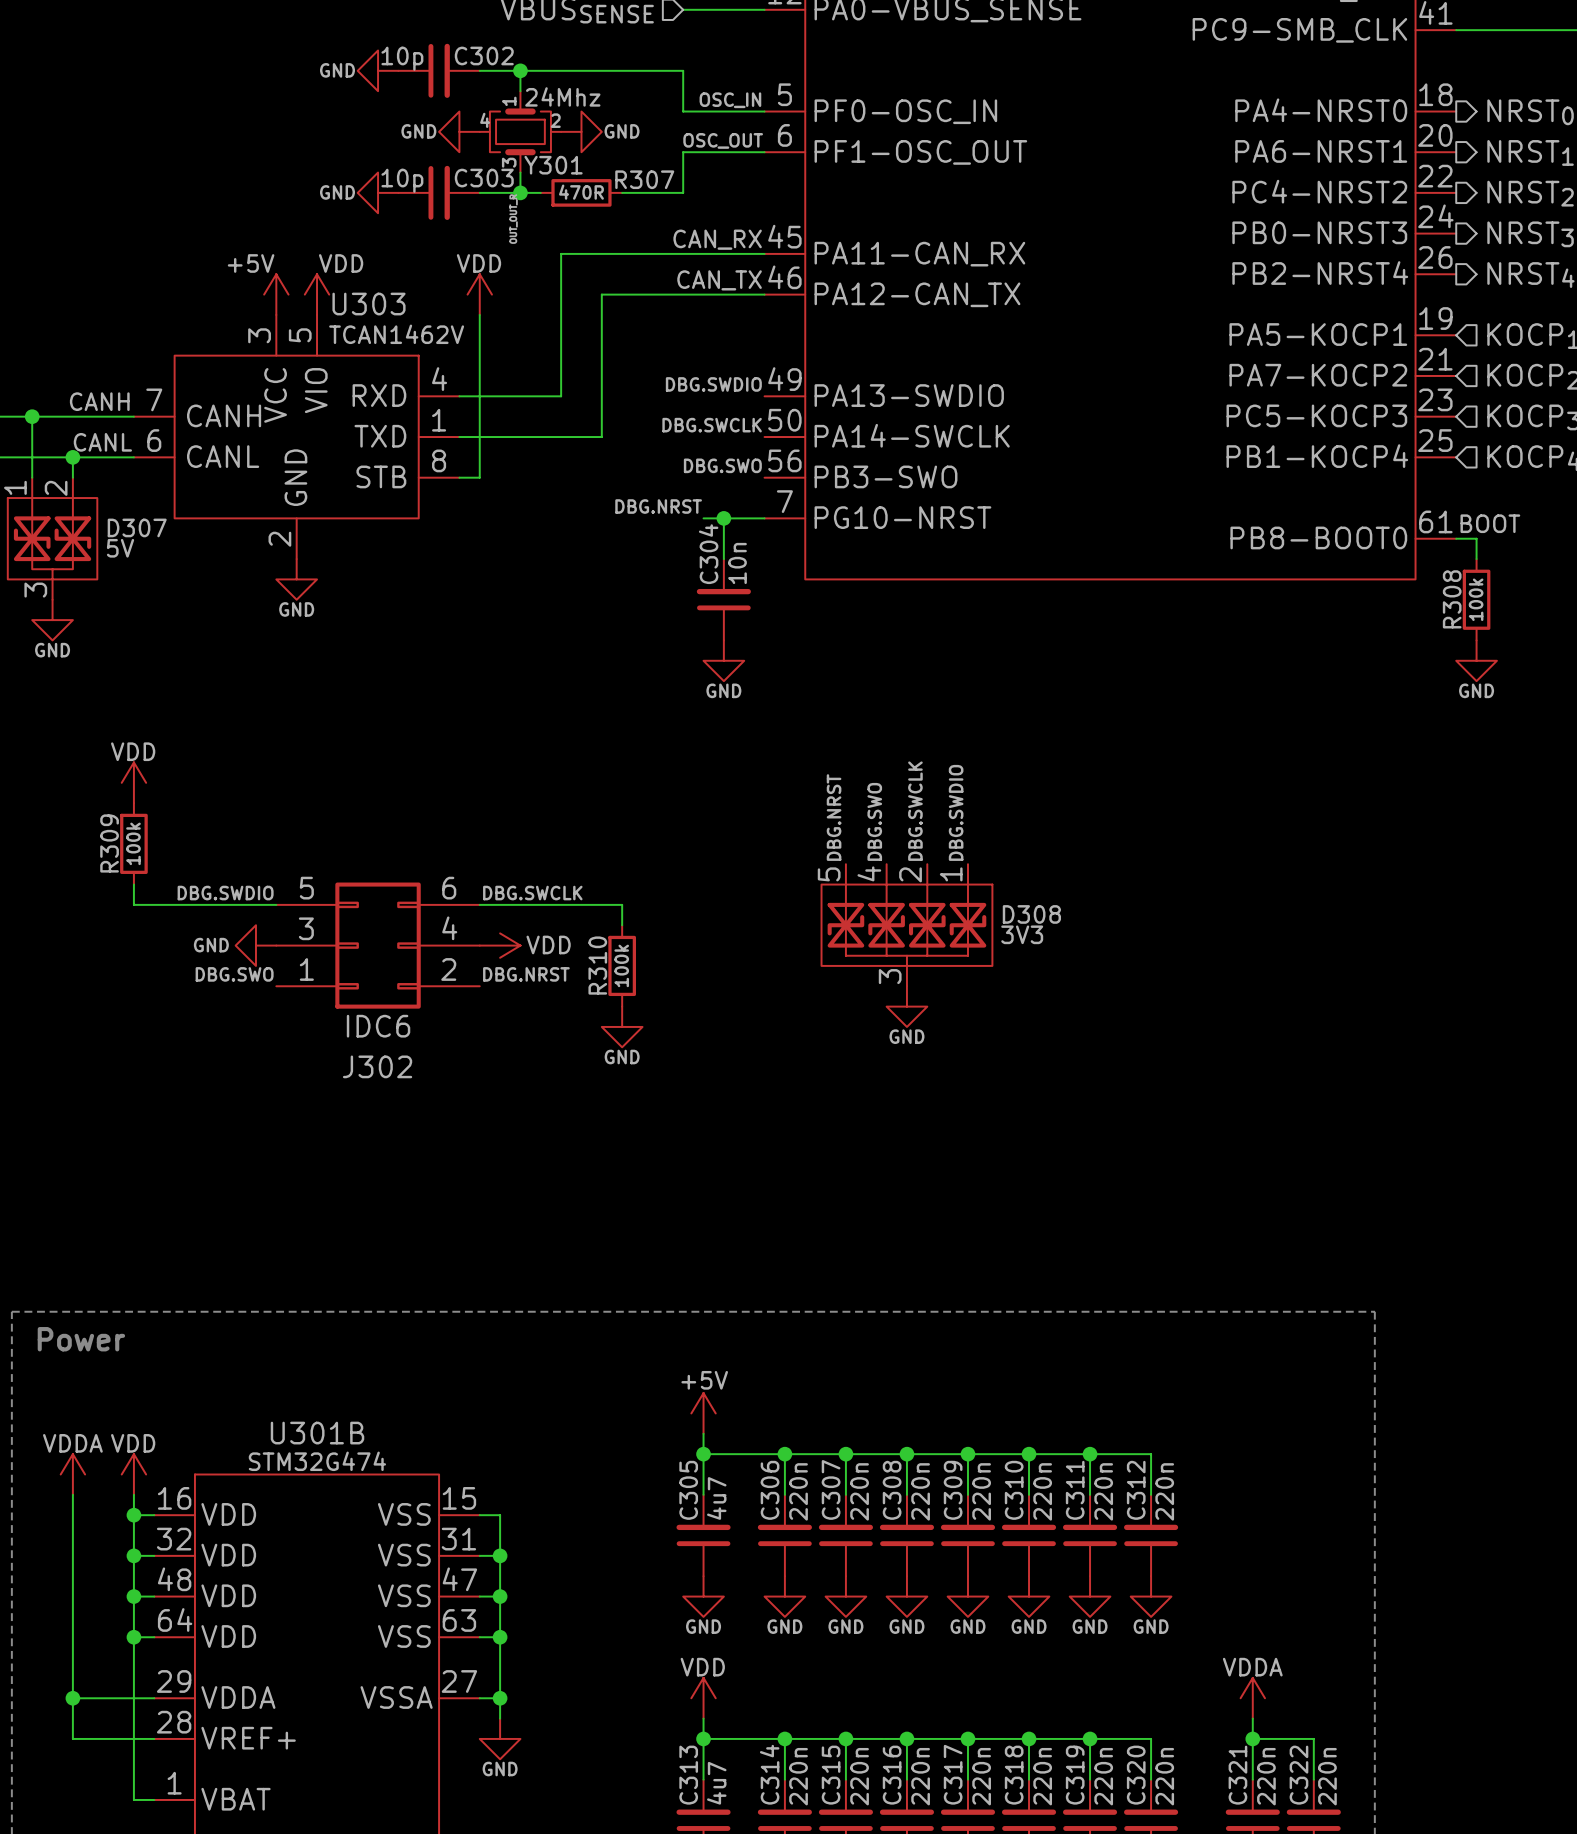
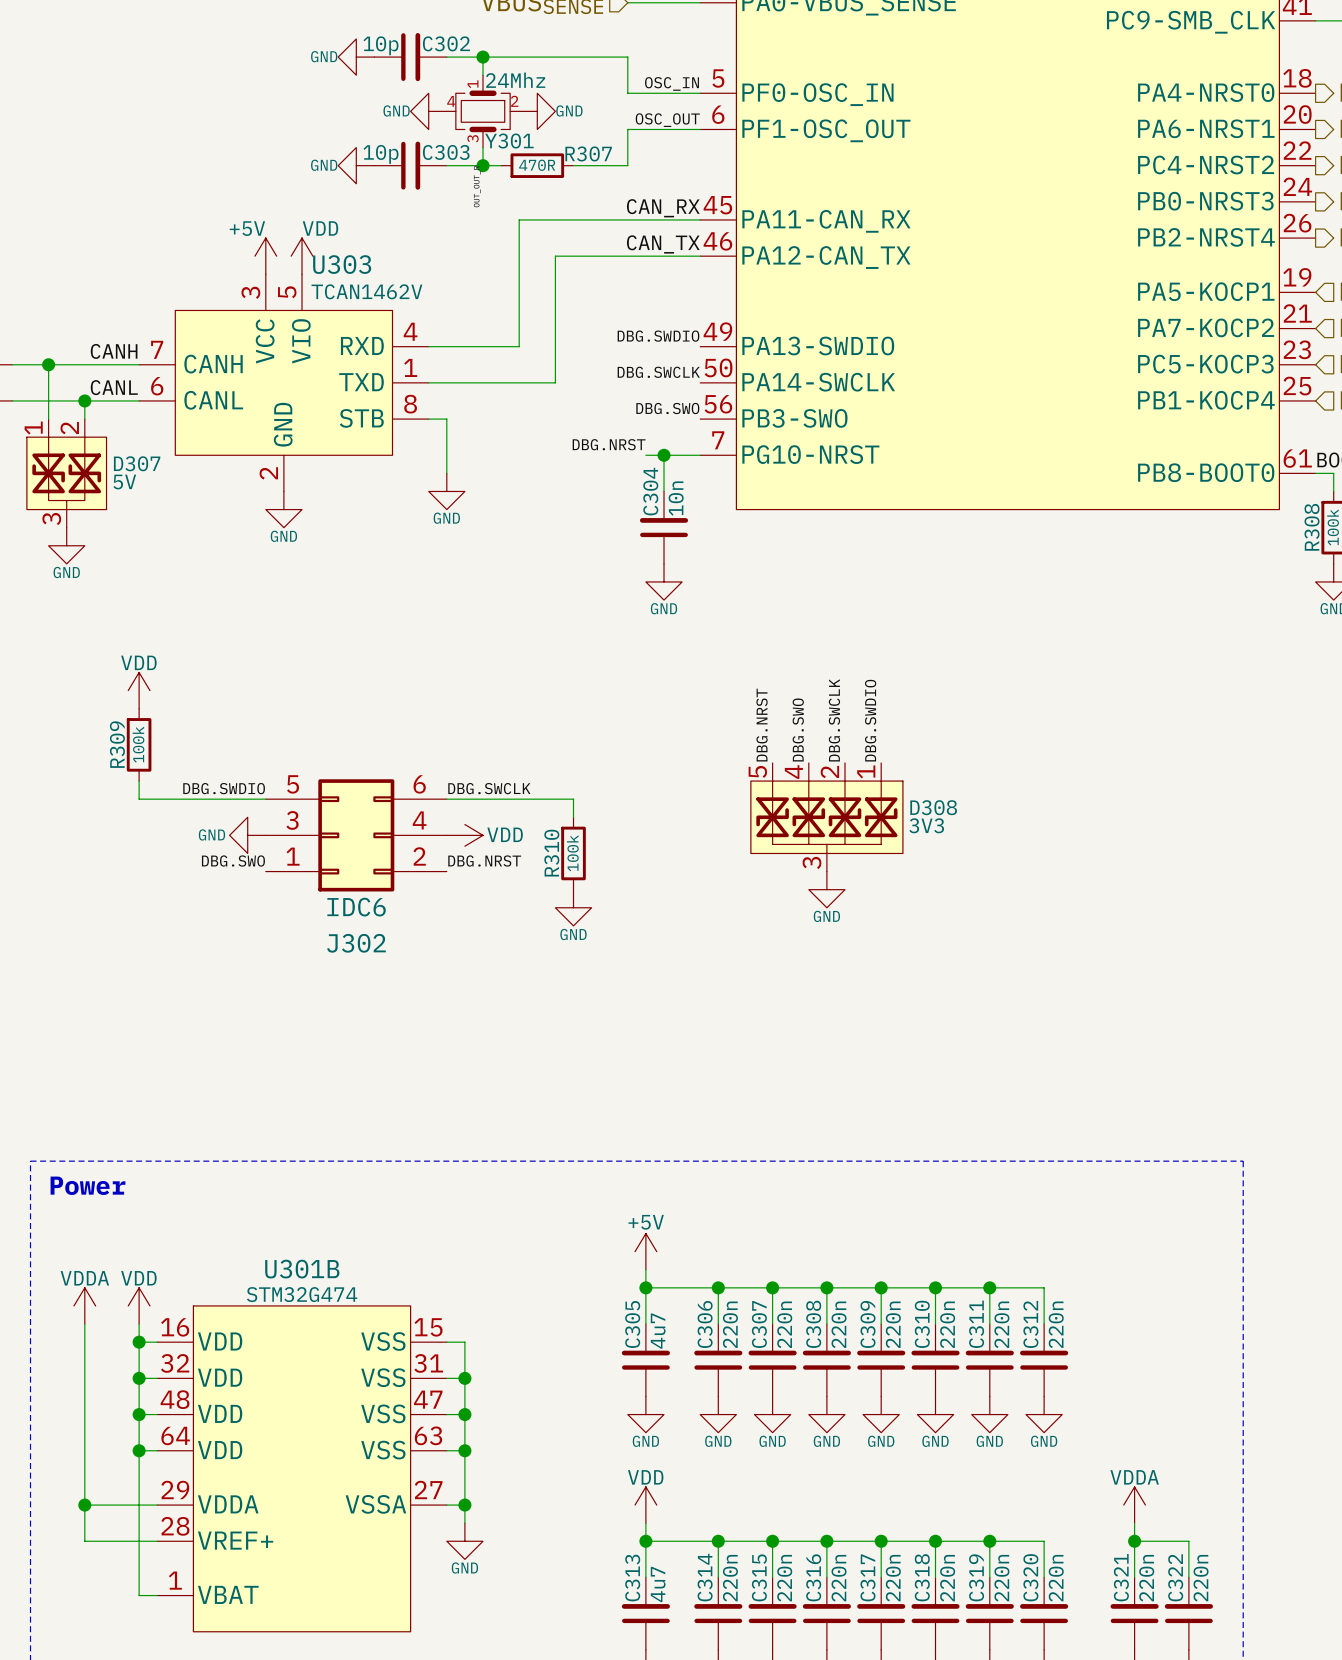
power symbol: VDD (479, 294) -> none
wire: (479, 314) (479, 477) -> (446, 473) (446, 419)
power symbol: none -> GND (446, 491)

